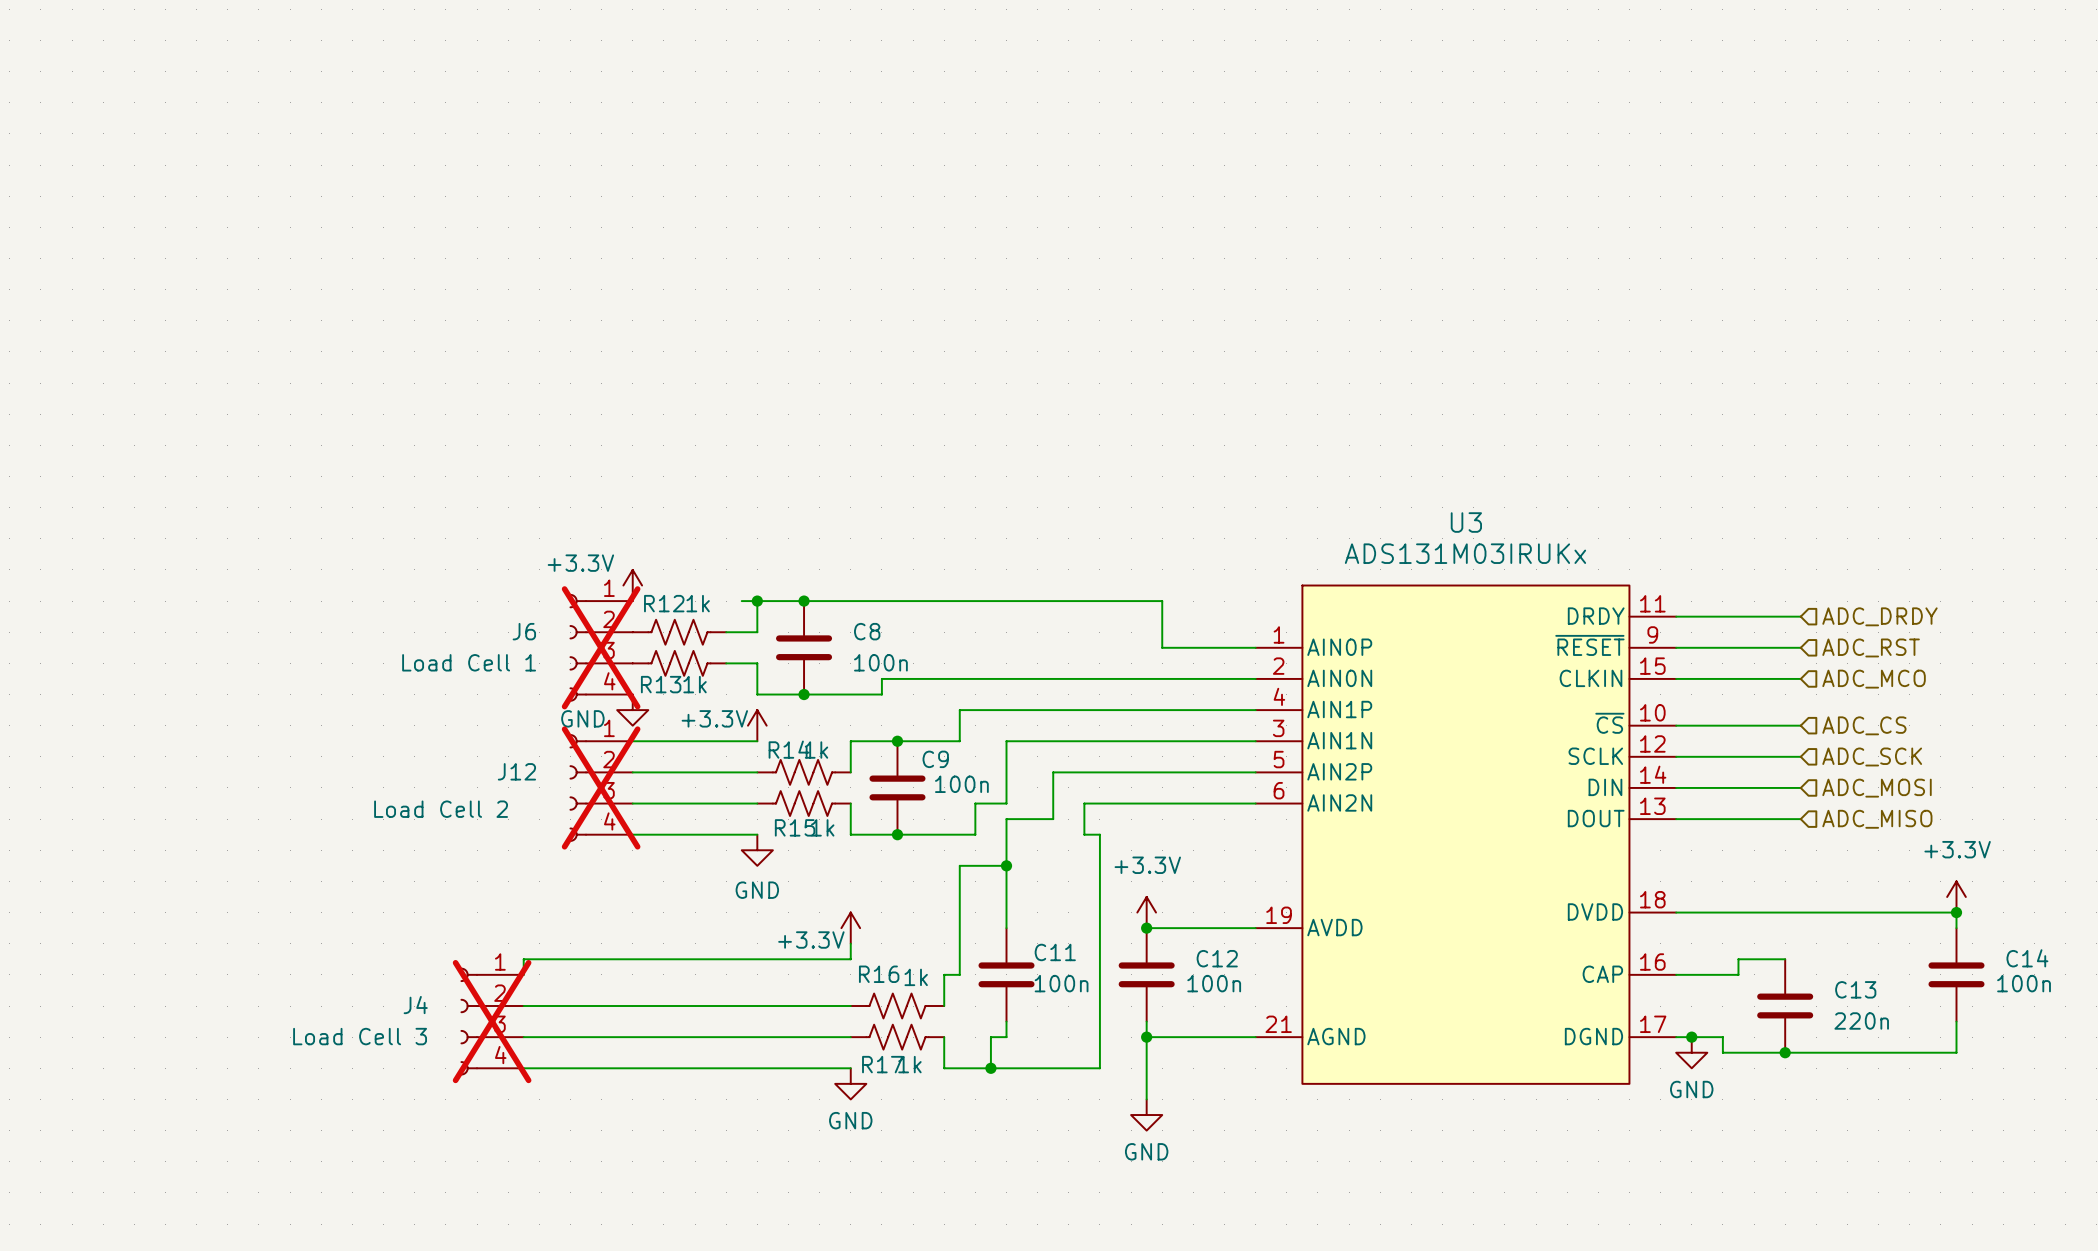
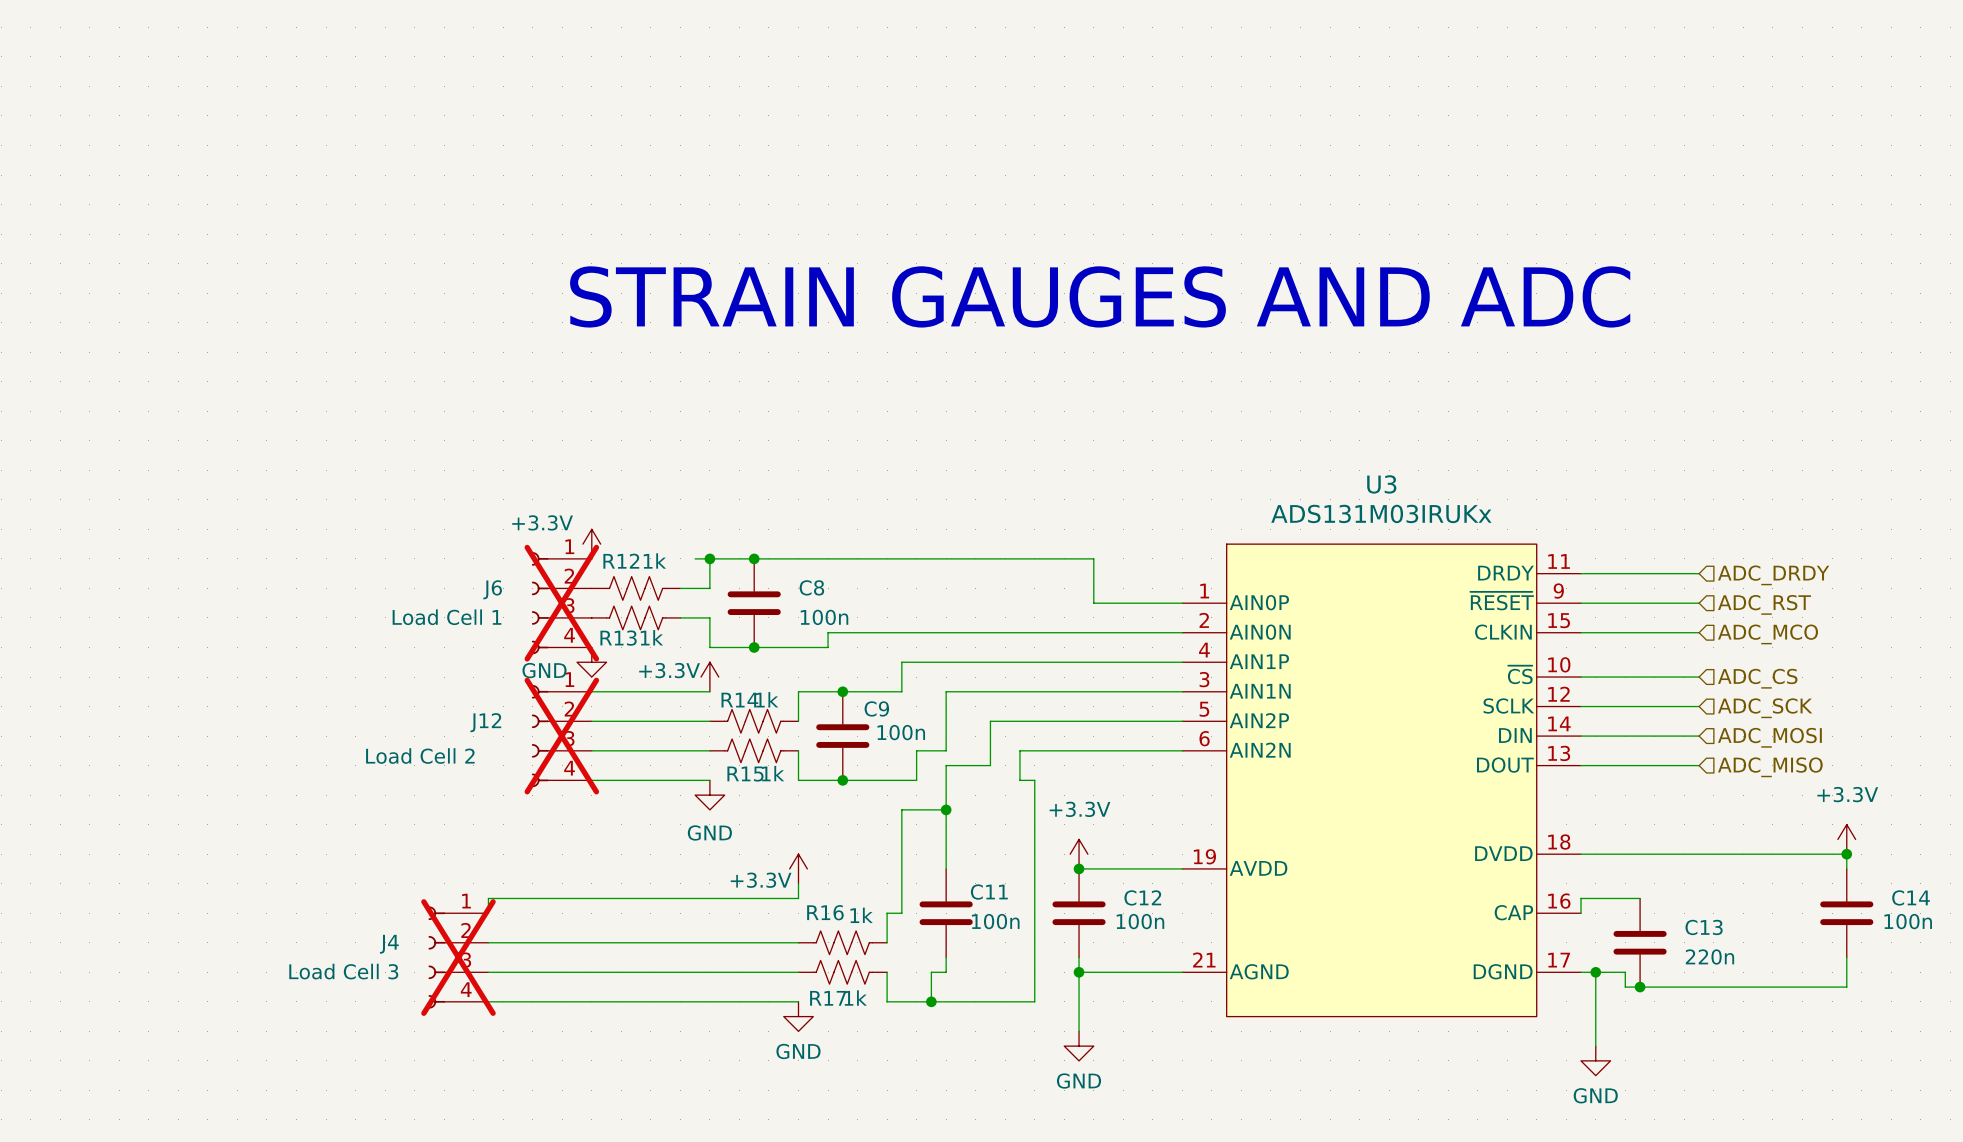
text: none -> STRAIN GAUGES AND ADC (1100, 296)
wire: (1785, 959) (1738, 959) (1738, 974) (1676, 974) -> (1640, 898) (1581, 898) (1581, 913)
C13 position: (1785, 1006) -> (1640, 942)
wire: none -> (1595, 972) (1595, 1046)
power symbol position: GND (1691, 1052) -> GND (1595, 1060)
junction position: (1785, 1052) -> (1640, 987)

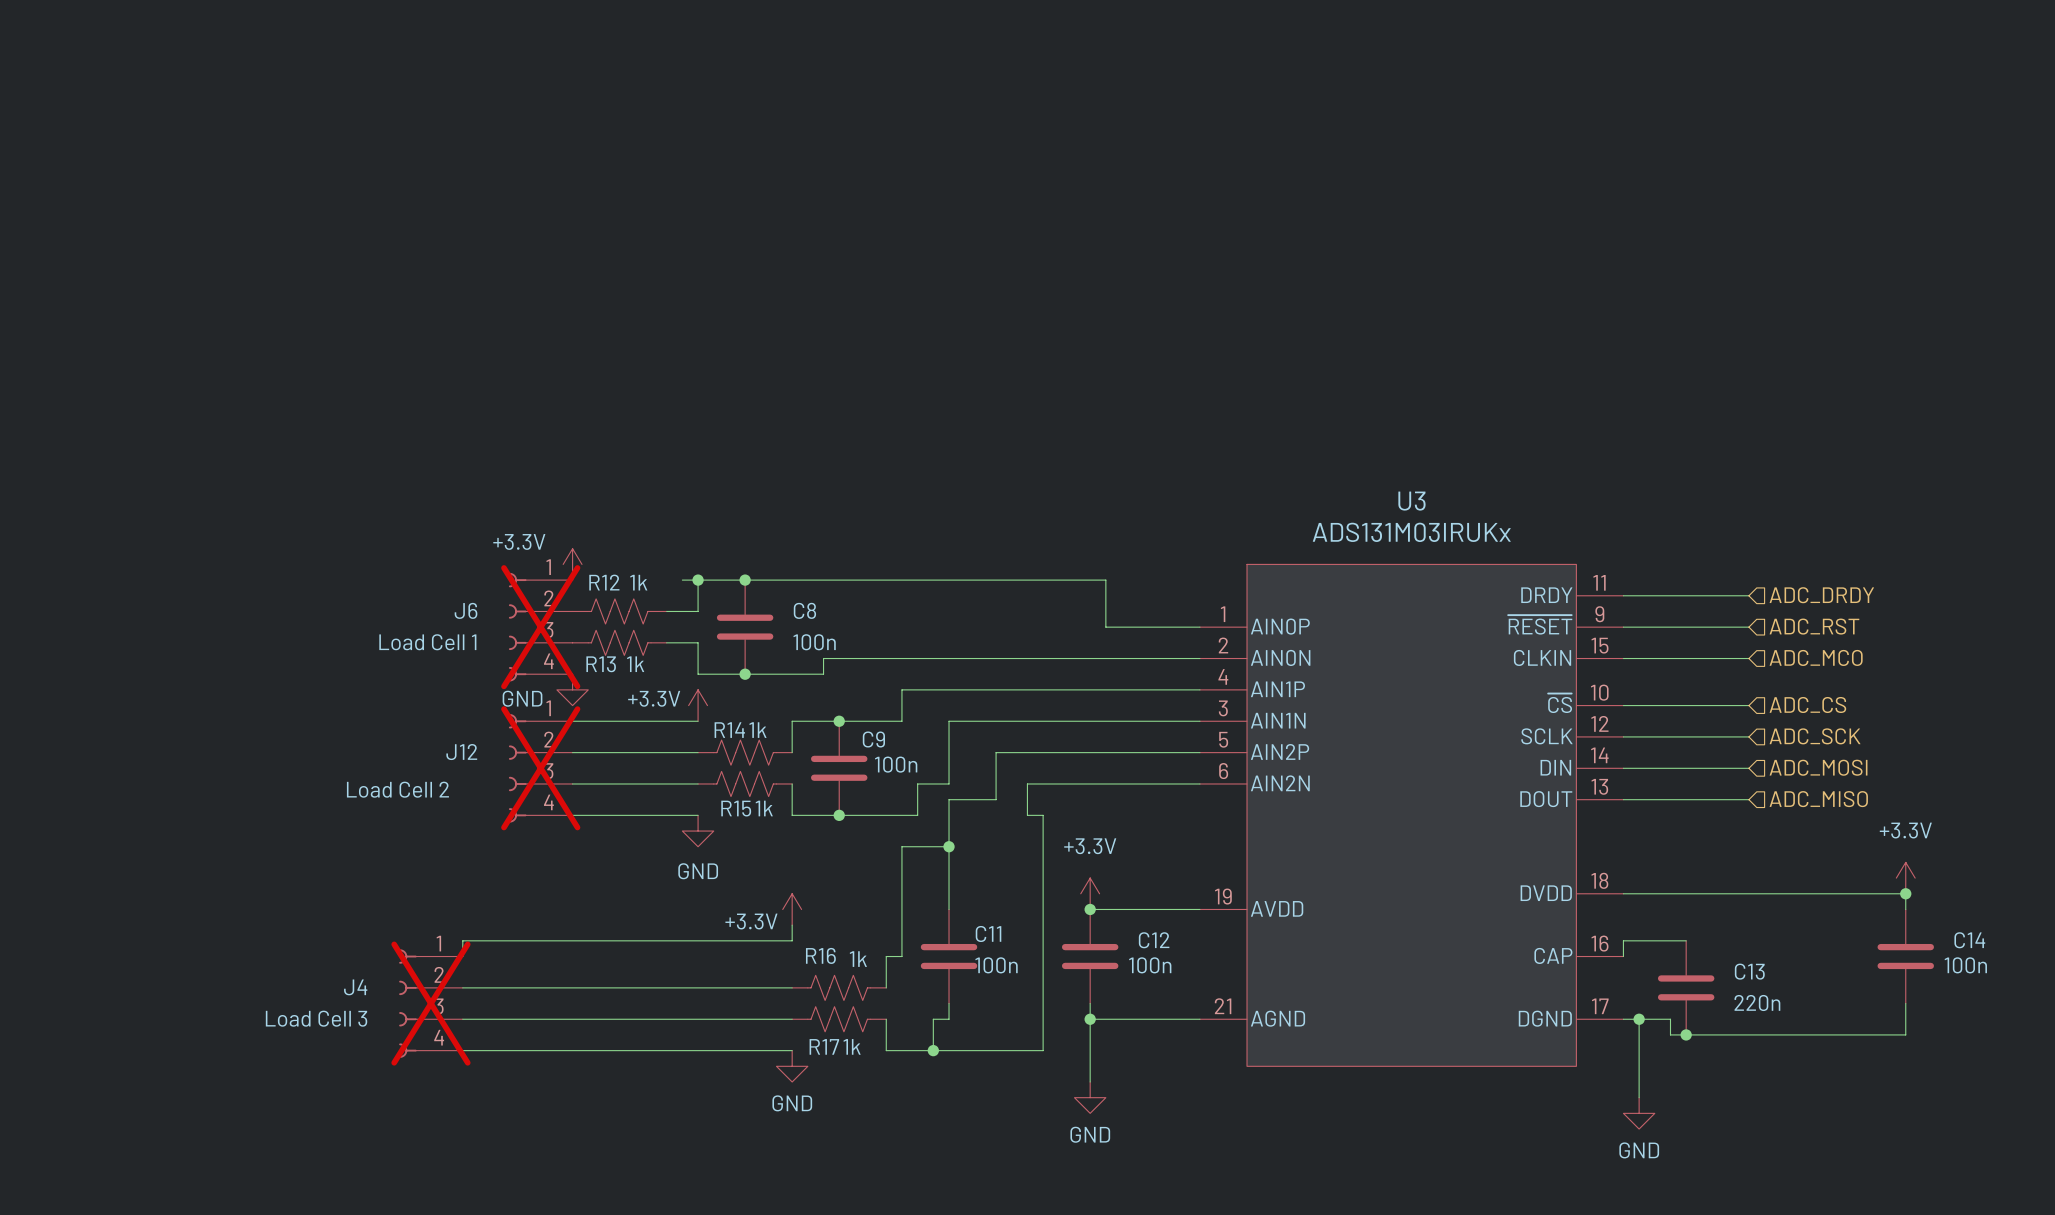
text: STRAIN GAUGES AND ADC (1100, 296) -> none

